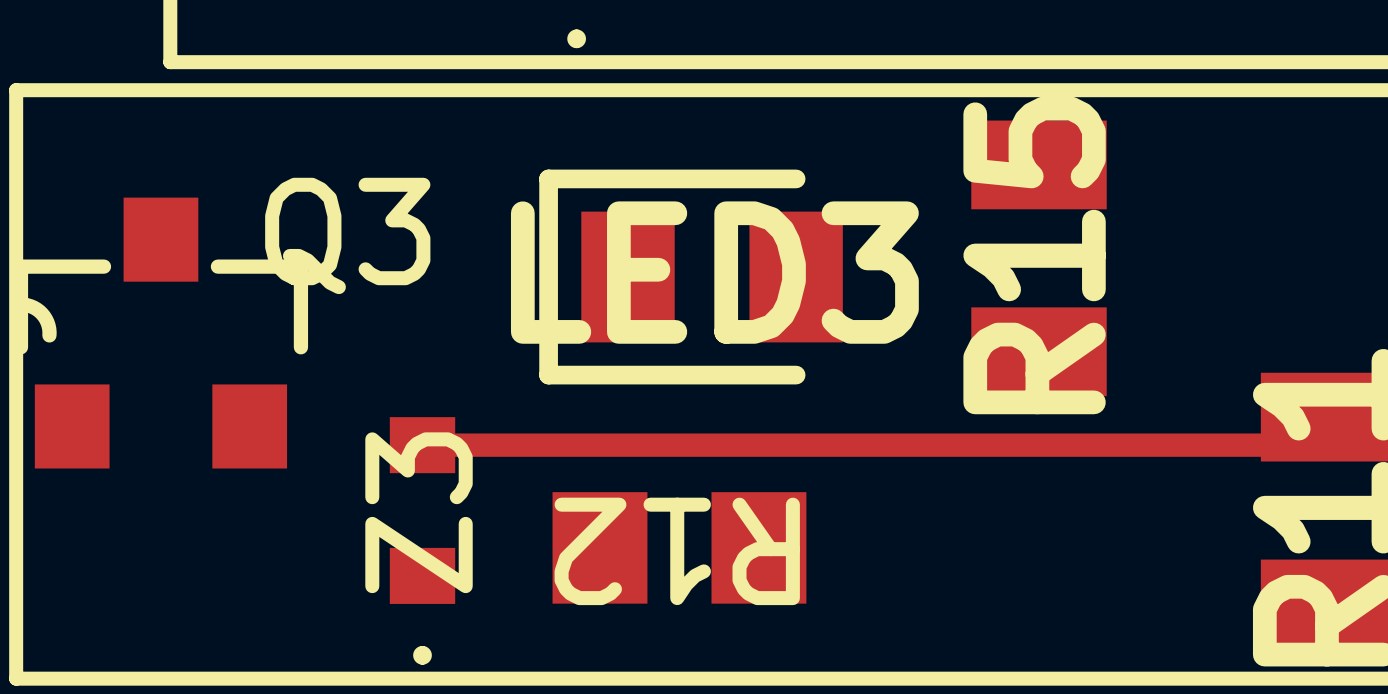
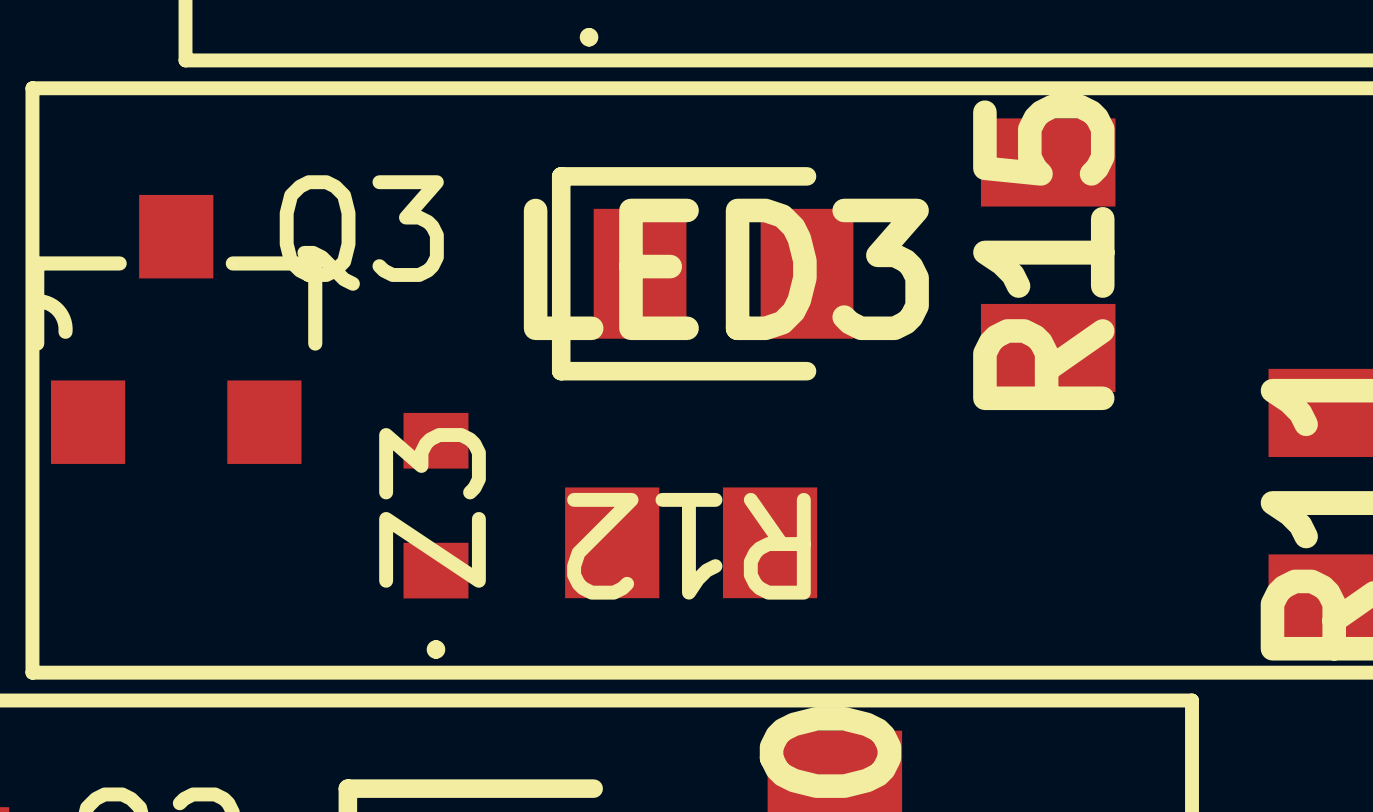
track: (1328, 417) (1300, 445) (422, 445) -> none

